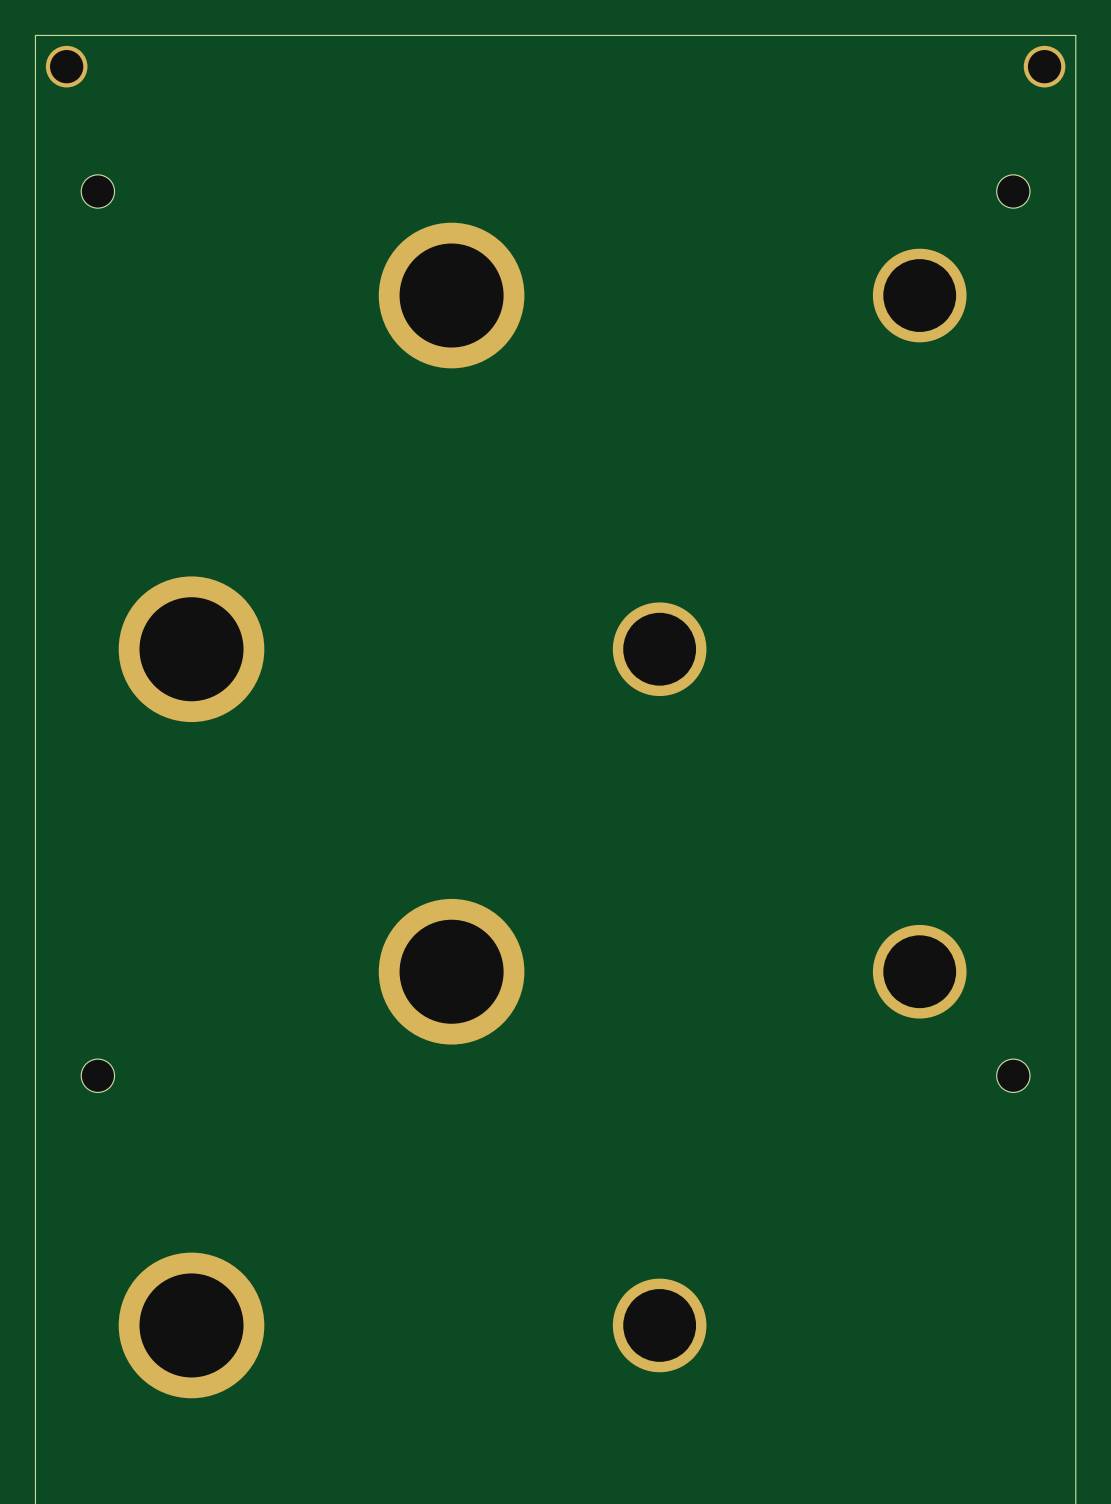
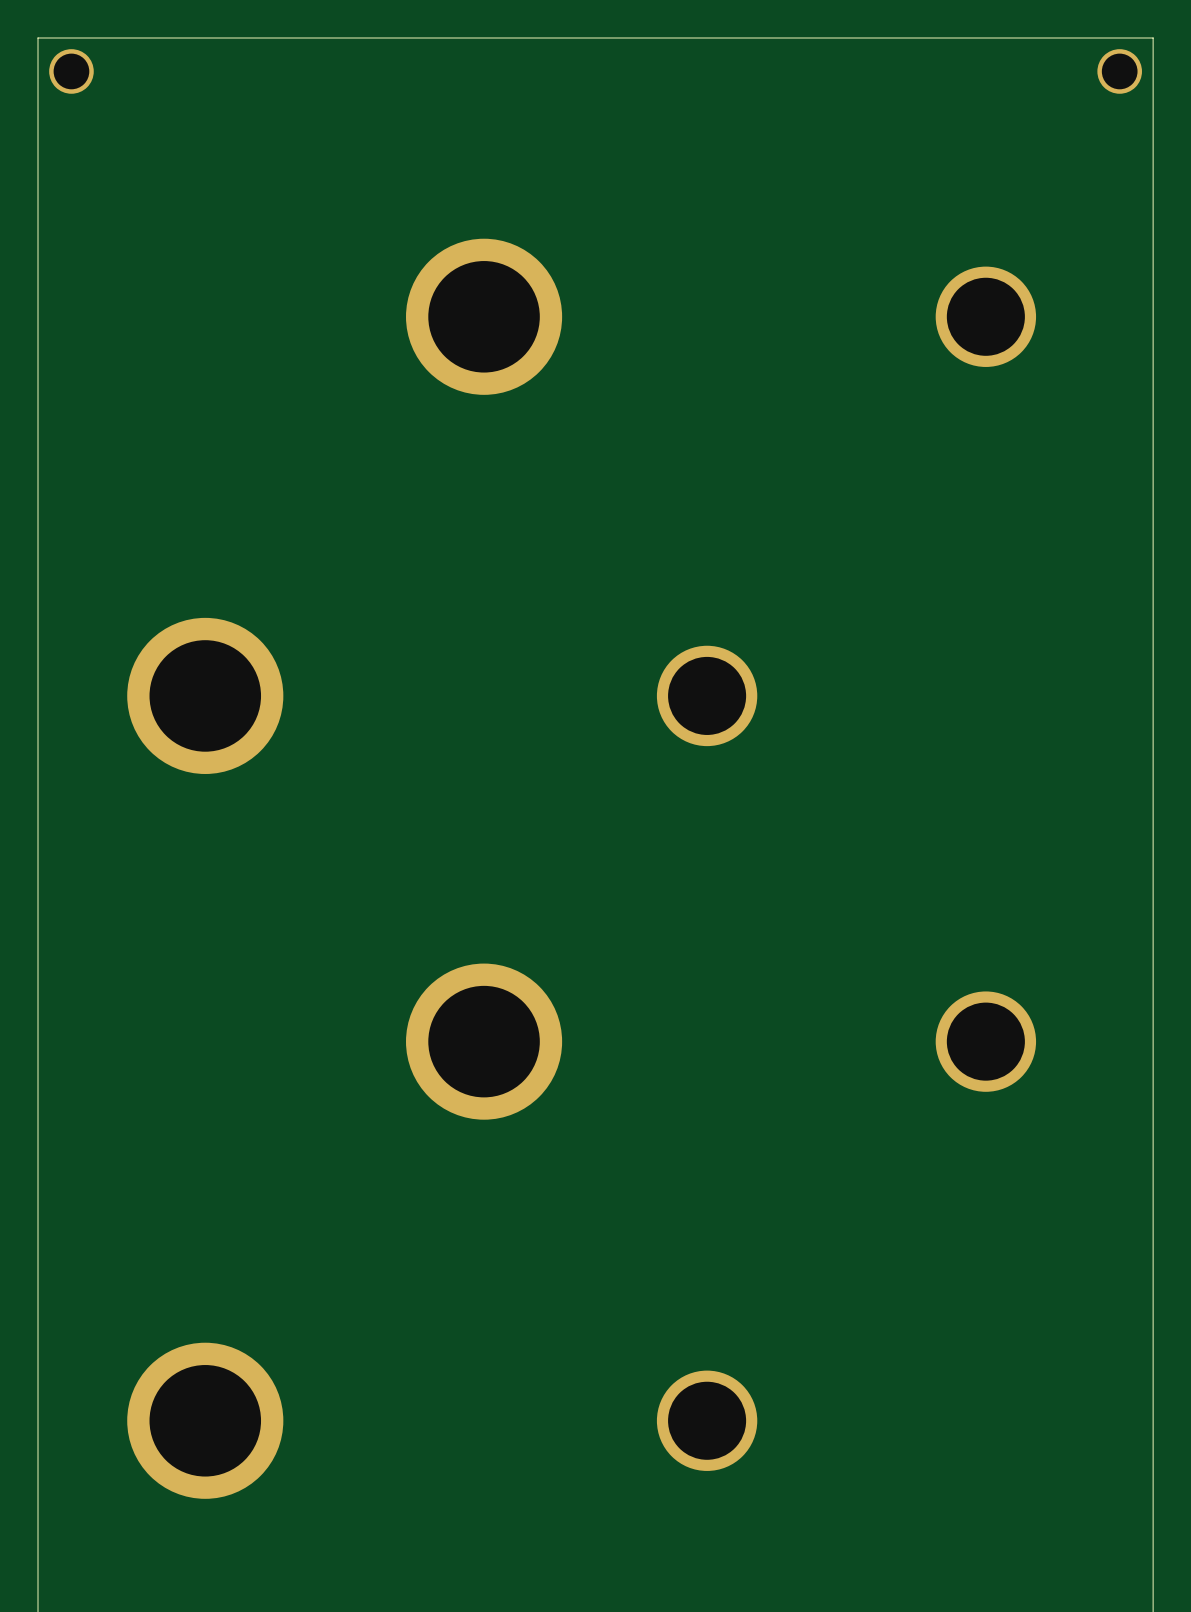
part: (97, 191) -> none
part: (1013, 191) -> none
part: (97, 1075) -> none
part: (1013, 1075) -> none

